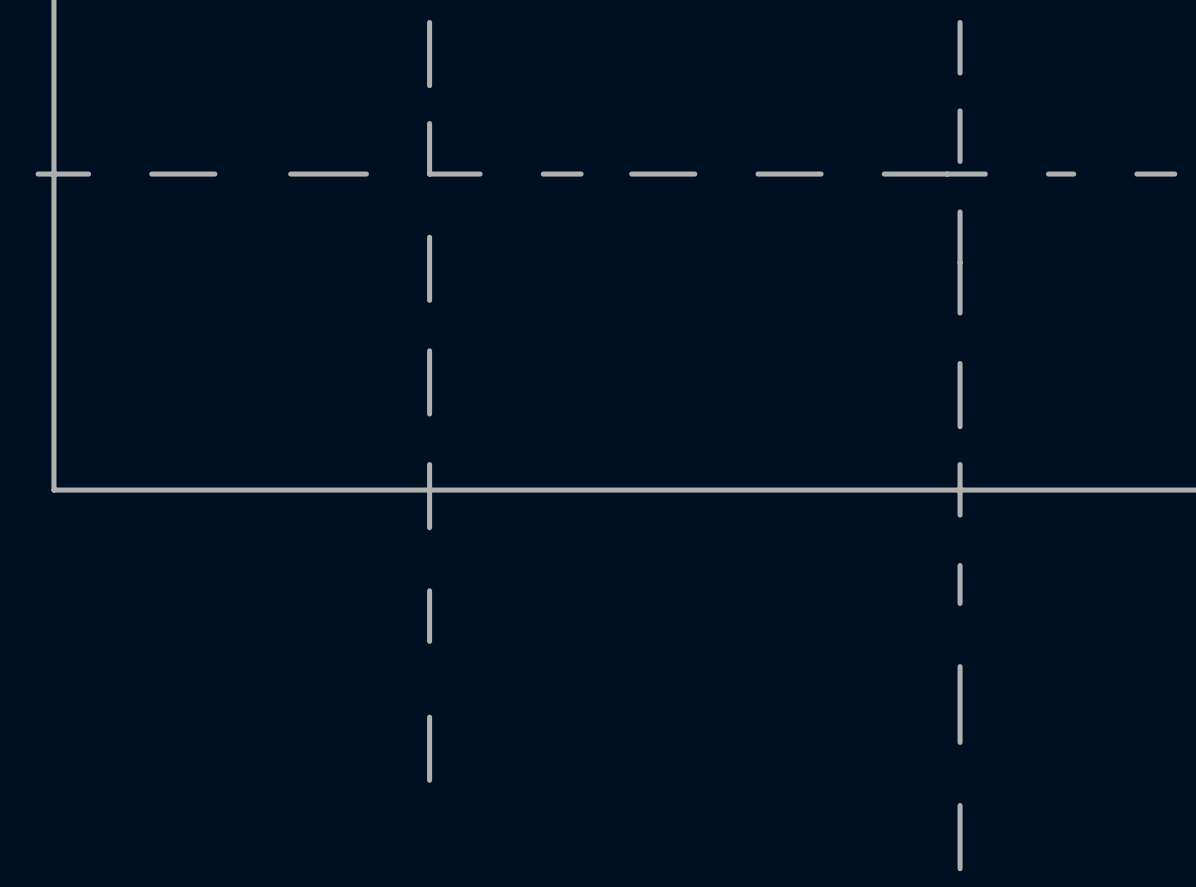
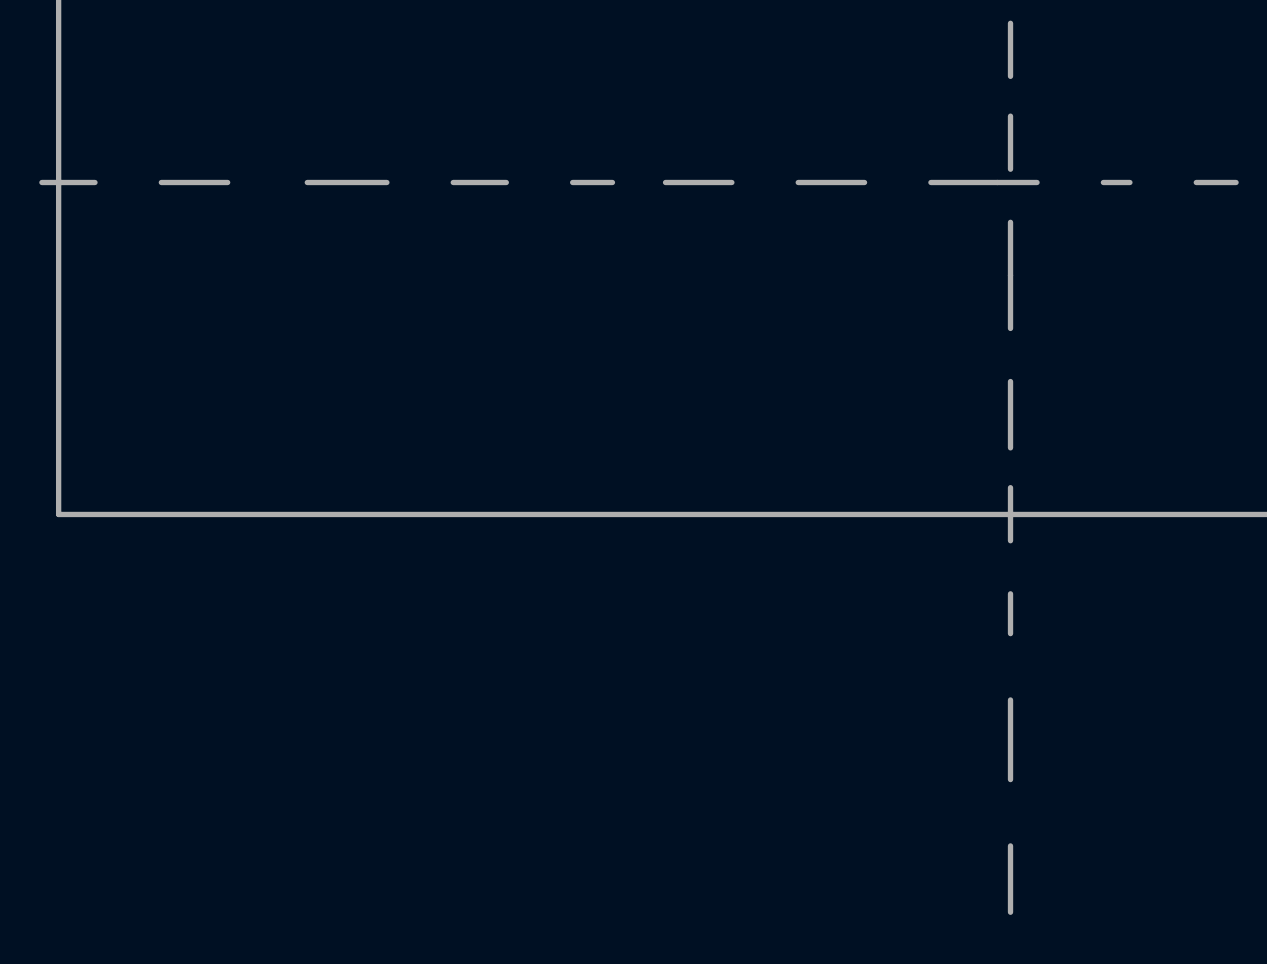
line: (429, 22) (429, 85) -> none
line: (429, 123) (429, 174) -> none
line: (429, 237) (429, 300) -> none
line: (429, 350) (429, 414) -> none
line: (429, 464) (429, 527) -> none
line: (429, 590) (429, 641) -> none
line: (429, 717) (429, 780) -> none

